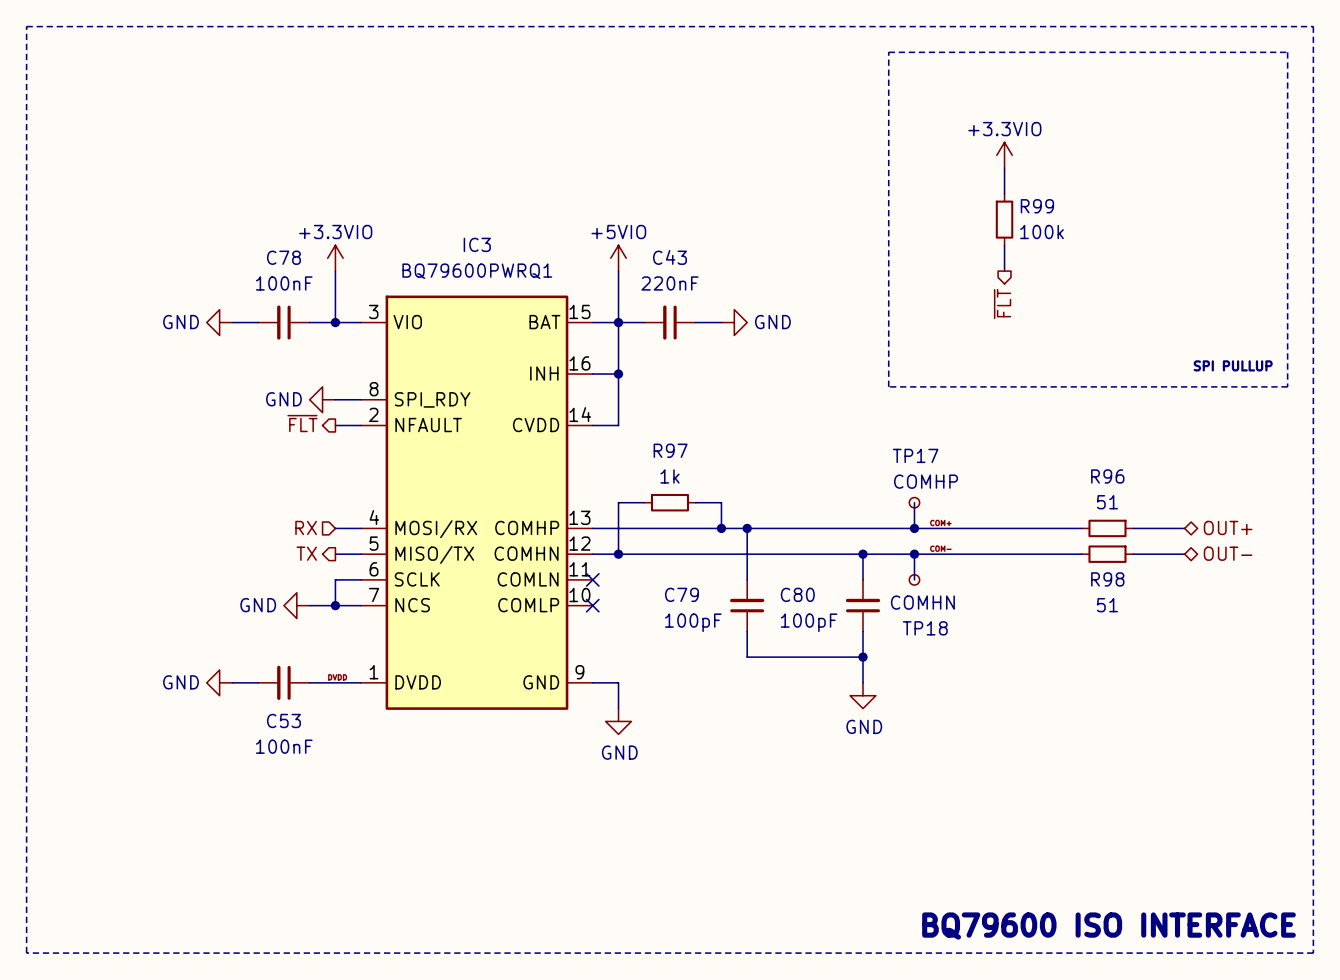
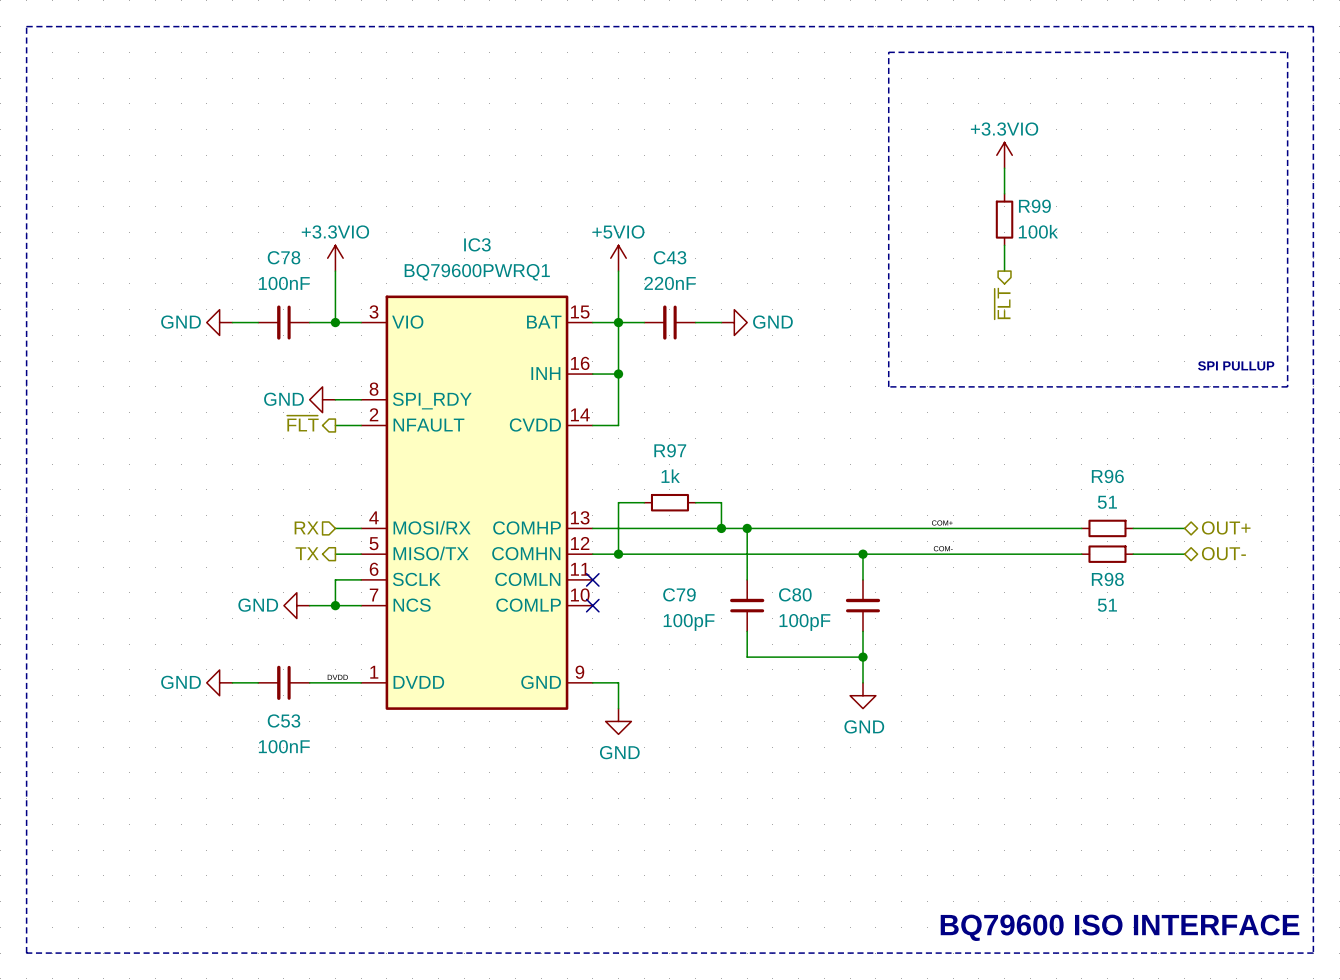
wire: (914, 502) (914, 528) -> none
TP17: COMHP (914, 502) -> none
junction: (914, 528) -> none
wire: (914, 554) (914, 579) -> none
junction: (914, 554) -> none
TP18: COMHN (914, 579) -> none

